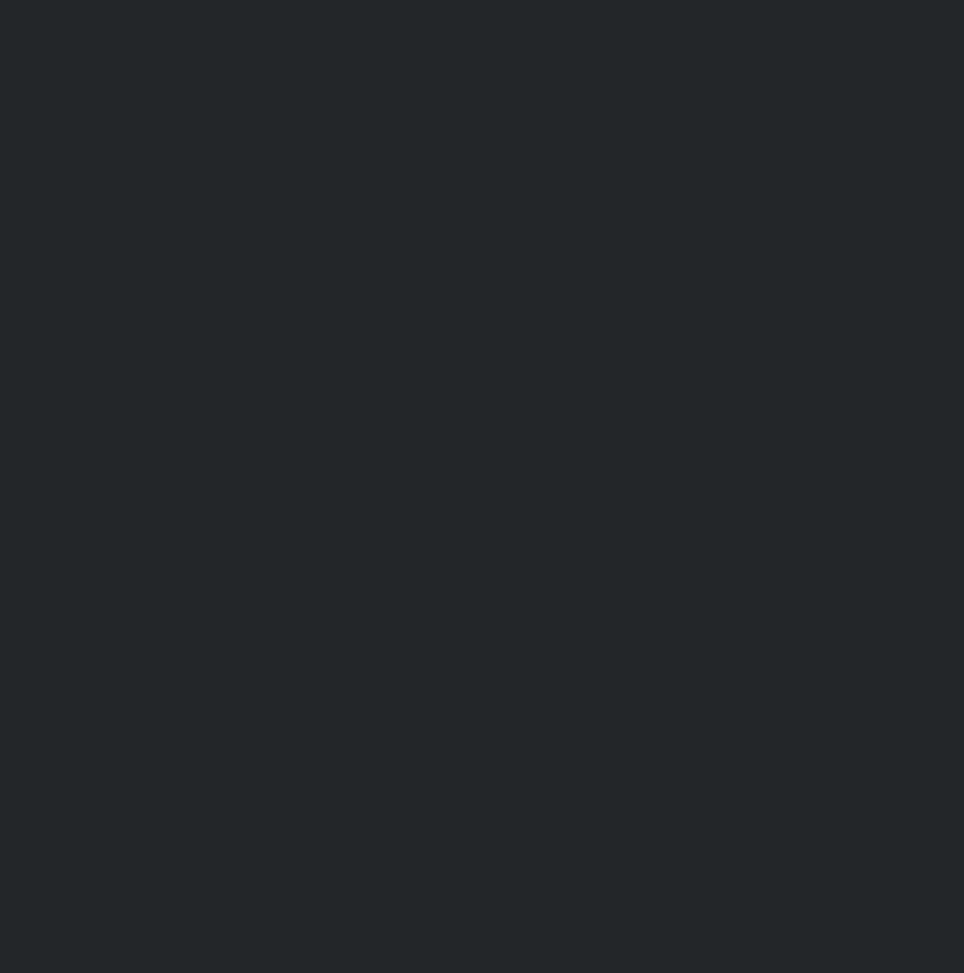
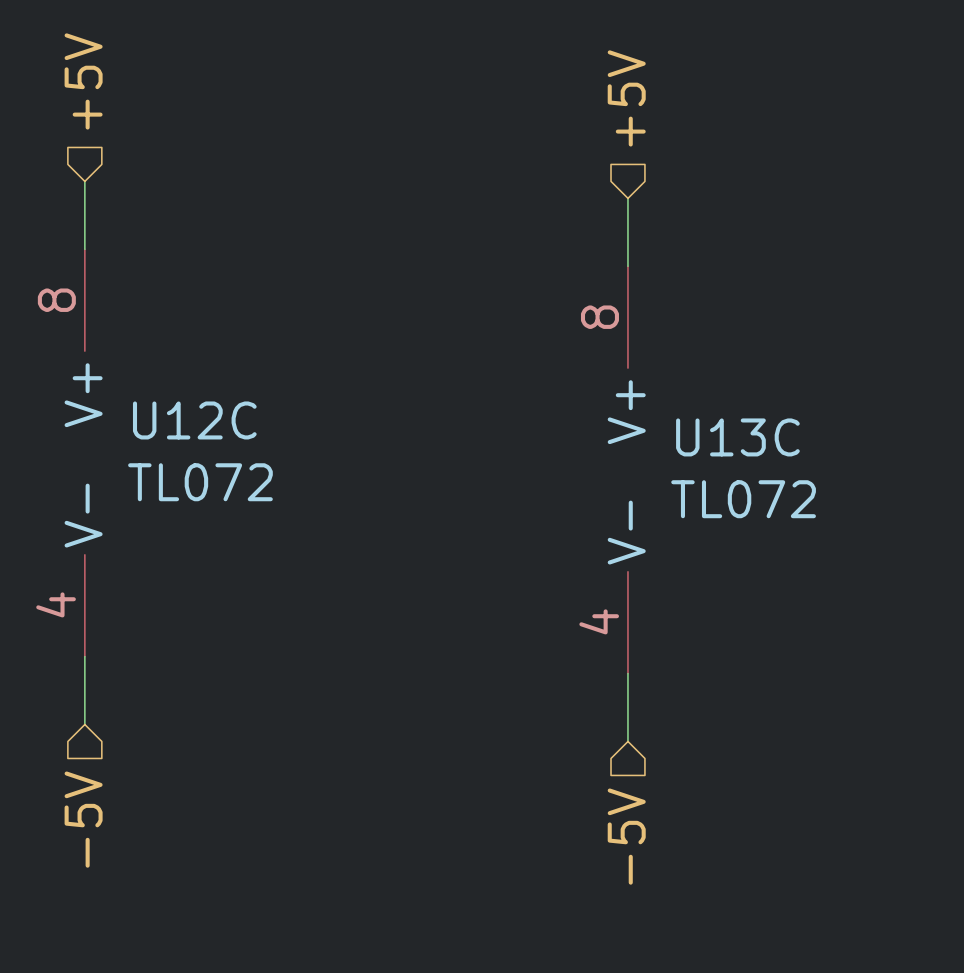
hierarchical label: none -> +5V (83, 81)
hierarchical label: none -> +5V (626, 98)
wire: none -> (84, 181) (84, 249)
wire: none -> (627, 198) (627, 266)
U12C: none -> TL072 (84, 452)
U13C: none -> TL072 (627, 469)
wire: none -> (84, 656) (84, 724)
wire: none -> (627, 673) (627, 741)
hierarchical label: none -> -5V (83, 819)
hierarchical label: none -> -5V (626, 836)

